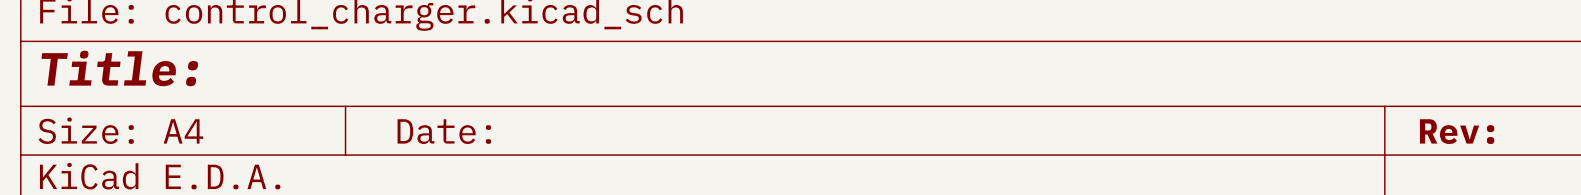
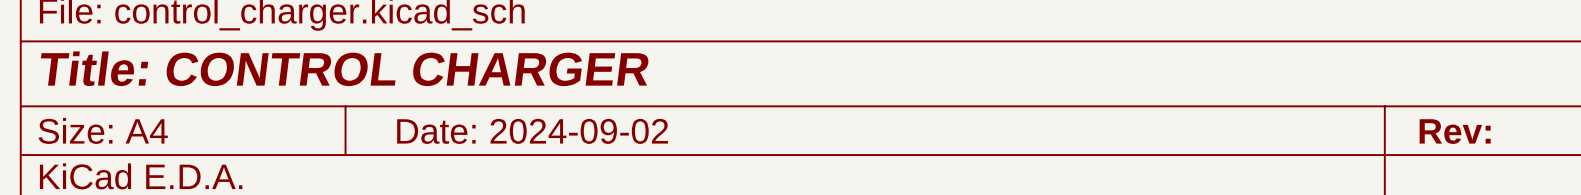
title block: Title: (119, 68) -> Title: CONTROL CHARGER (344, 68)
title block: Date: (444, 131) -> Date: 2024-09-02 (532, 131)

